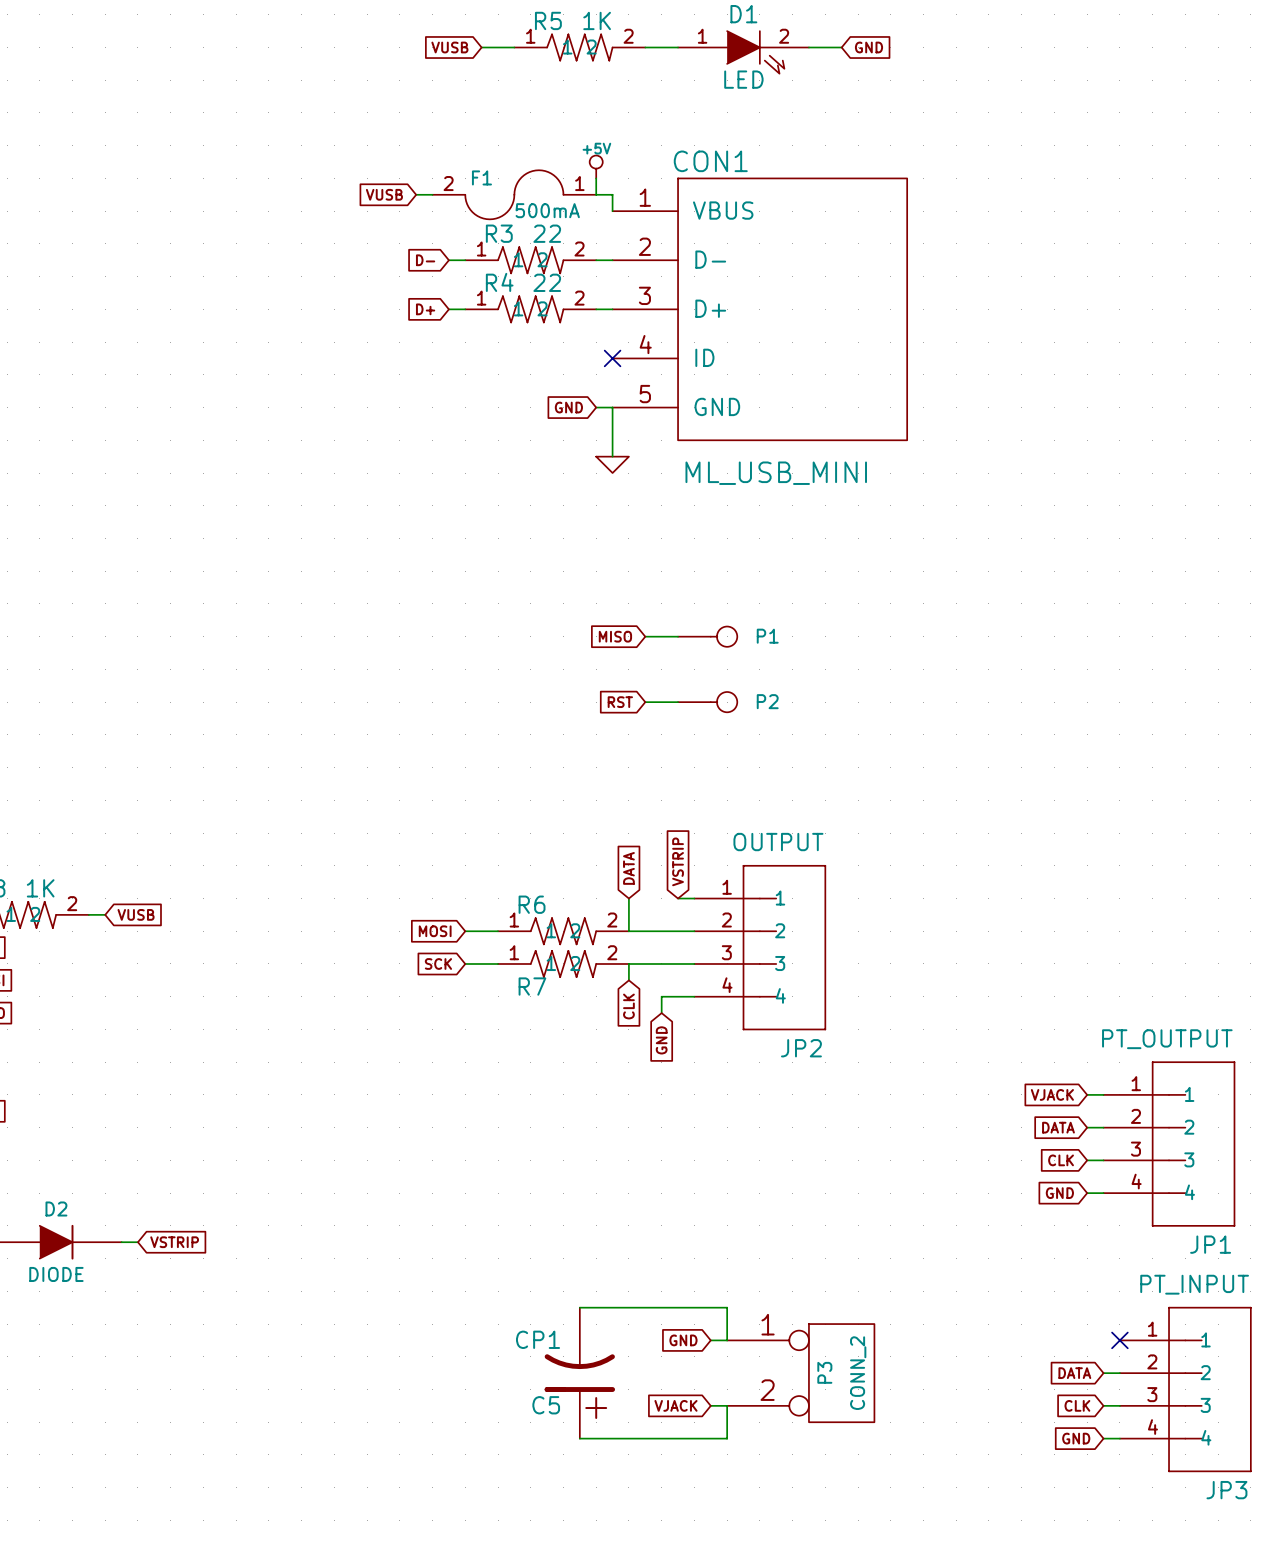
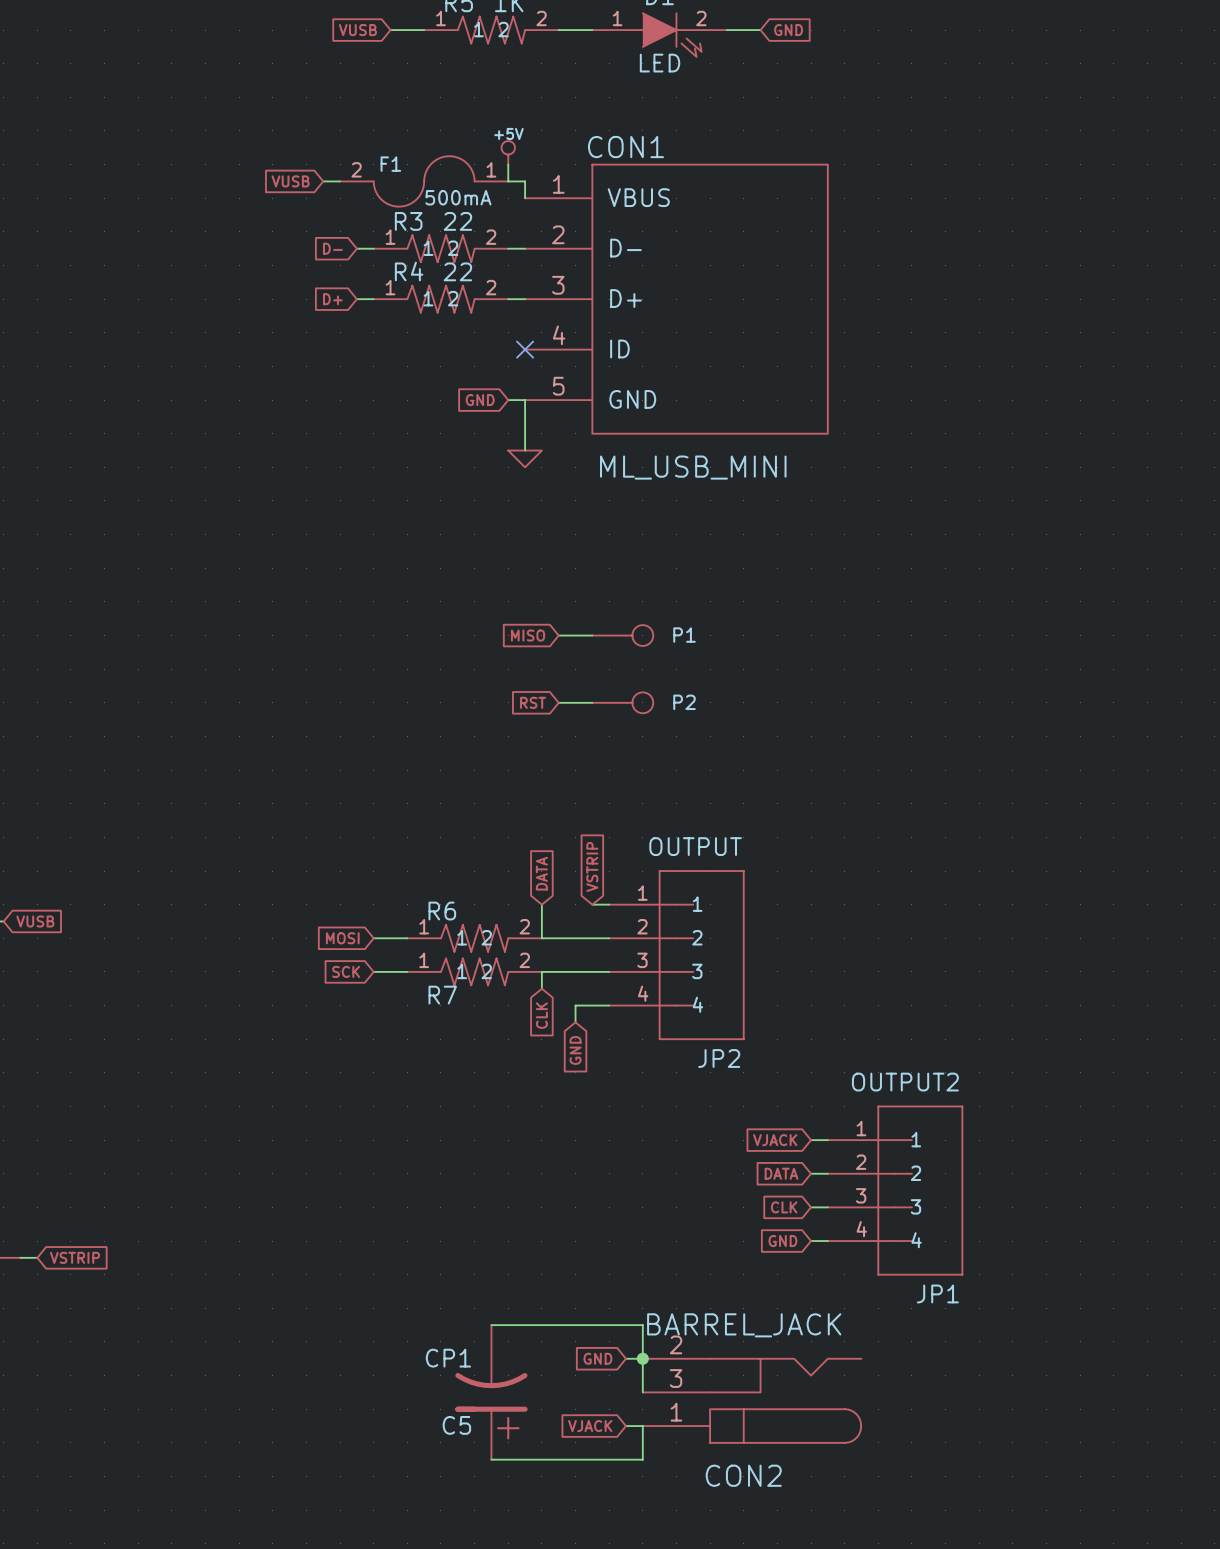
JP1 value: PT_OUTPUT (1167, 1039) -> OUTPUT2 (905, 1082)
global label position: VJACK (1052, 1094) -> VJACK (775, 1140)
wire: (1087, 1094) (1103, 1094) -> (811, 1140) (827, 1140)
global label: DATA (1058, 1127) -> none
wire: (1087, 1127) (1103, 1127) -> (811, 1173) (827, 1173)
JP1 position: (1169, 1144) -> (895, 1190)
global label: none -> DATA (781, 1173)
global label: CLK (1061, 1160) -> none
wire: (1087, 1160) (1103, 1160) -> (811, 1207) (827, 1207)
global label: none -> CLK (784, 1207)
global label: GND (1059, 1193) -> none
wire: (1087, 1193) (1103, 1193) -> (811, 1241) (827, 1241)
global label: none -> GND (782, 1241)
wire: none -> (642, 1358) (642, 1392)
junction: none -> (642, 1358)
no-connect mark: (1119, 1340) -> none
P3: CONN_2 (800, 1373) -> none
global label: DATA (1074, 1373) -> none
wire: (1103, 1373) (1119, 1373) -> none
CON2: none -> BARREL_JACK (752, 1400)
JP3: PT_INPUT (1185, 1389) -> none
global label: CLK (1077, 1405) -> none
wire: (1103, 1405) (1119, 1405) -> none
global label: GND (1076, 1438) -> none
wire: (1103, 1438) (1119, 1438) -> none

